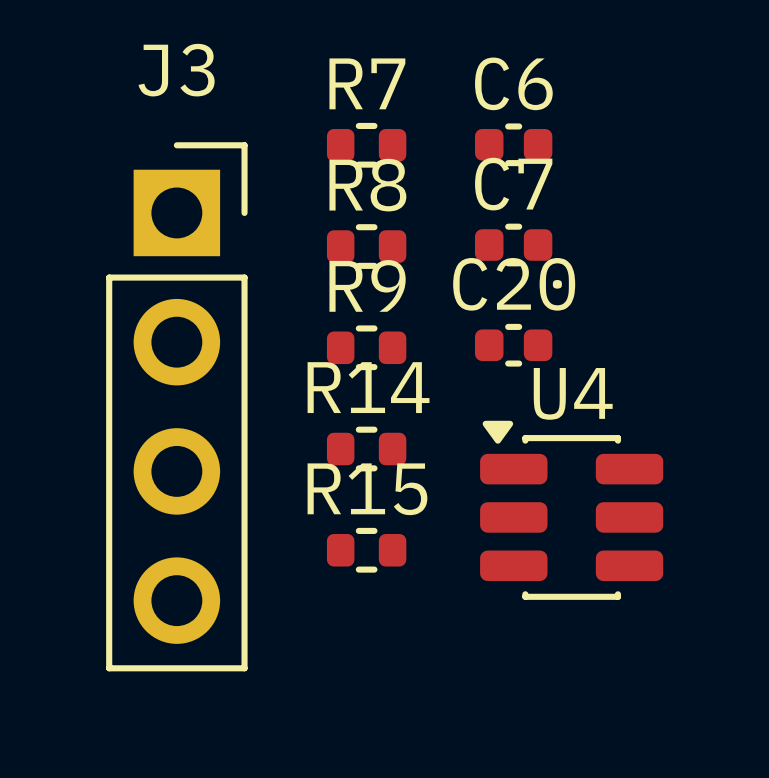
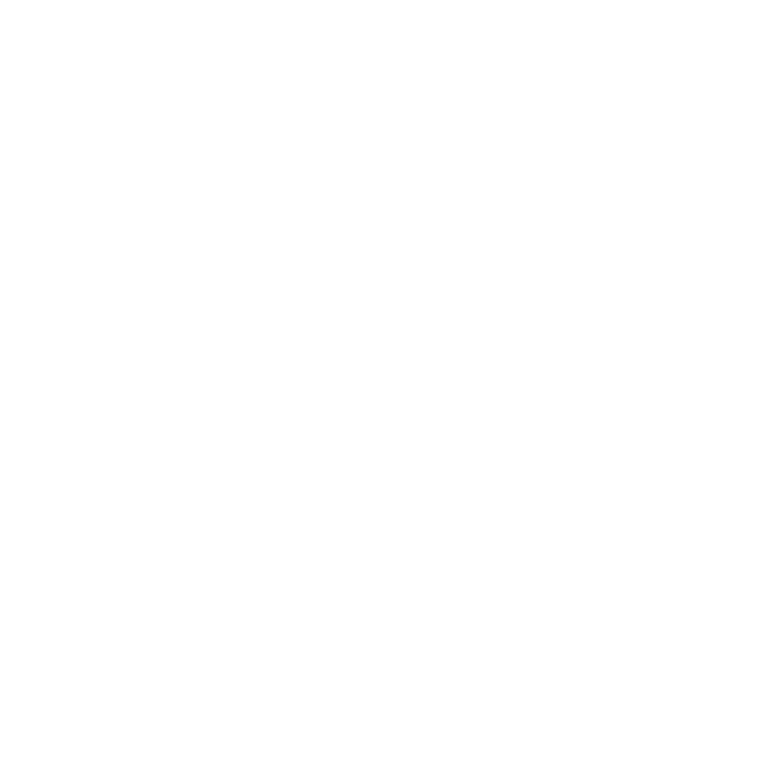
C6: (513, 144) -> none
R7: (366, 145) -> none
C7: (513, 245) -> none
R8: (366, 246) -> none
C20: (513, 345) -> none
R9: (366, 347) -> none
J3: (176, 406) -> none
R14: (366, 449) -> none
U4: (571, 510) -> none
R15: (366, 550) -> none

